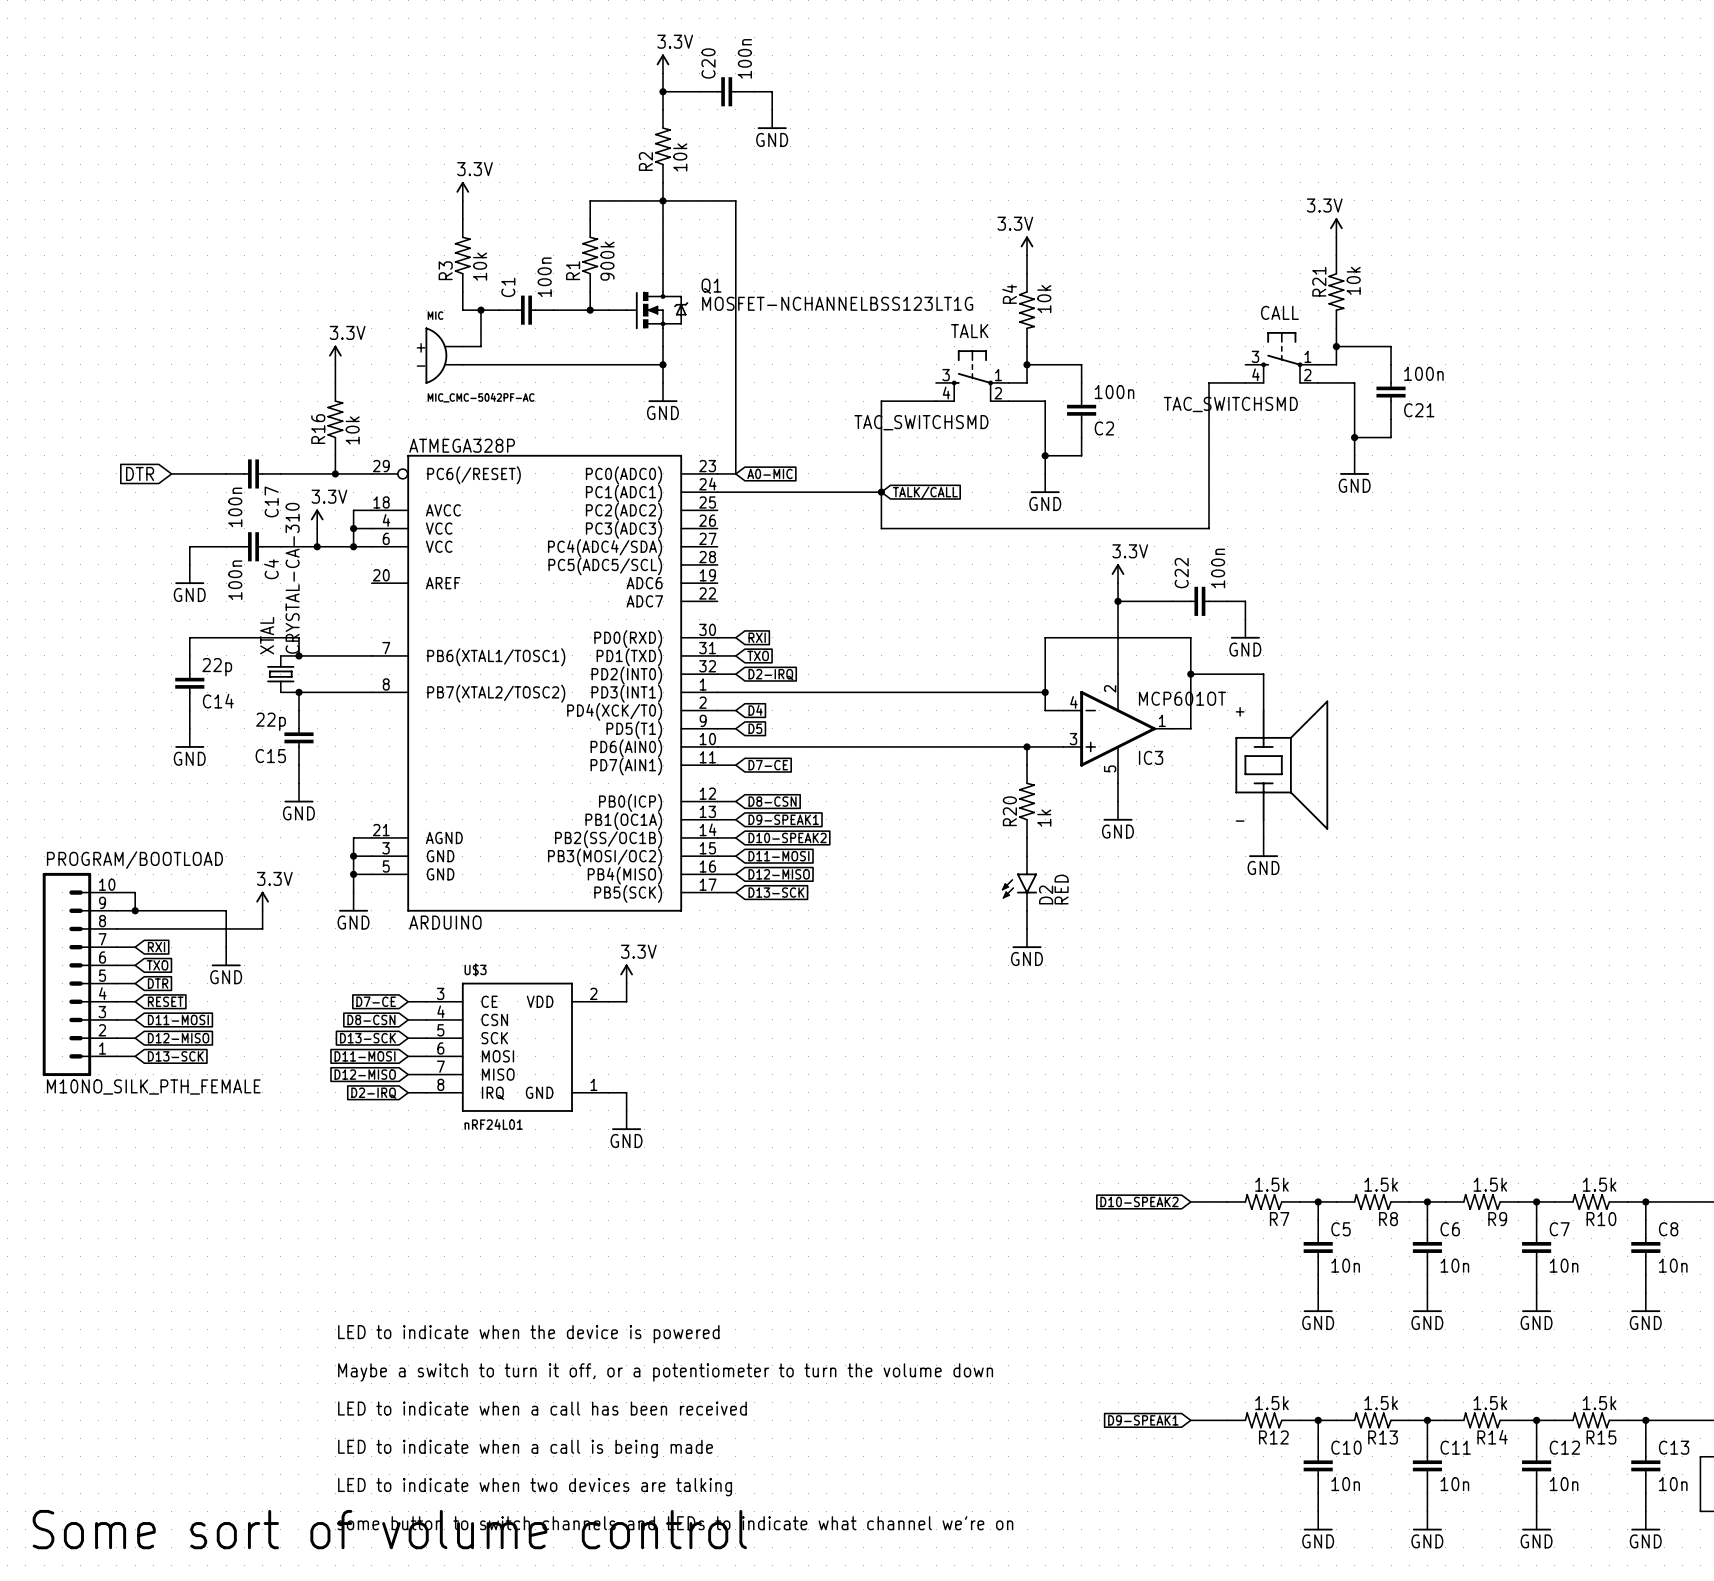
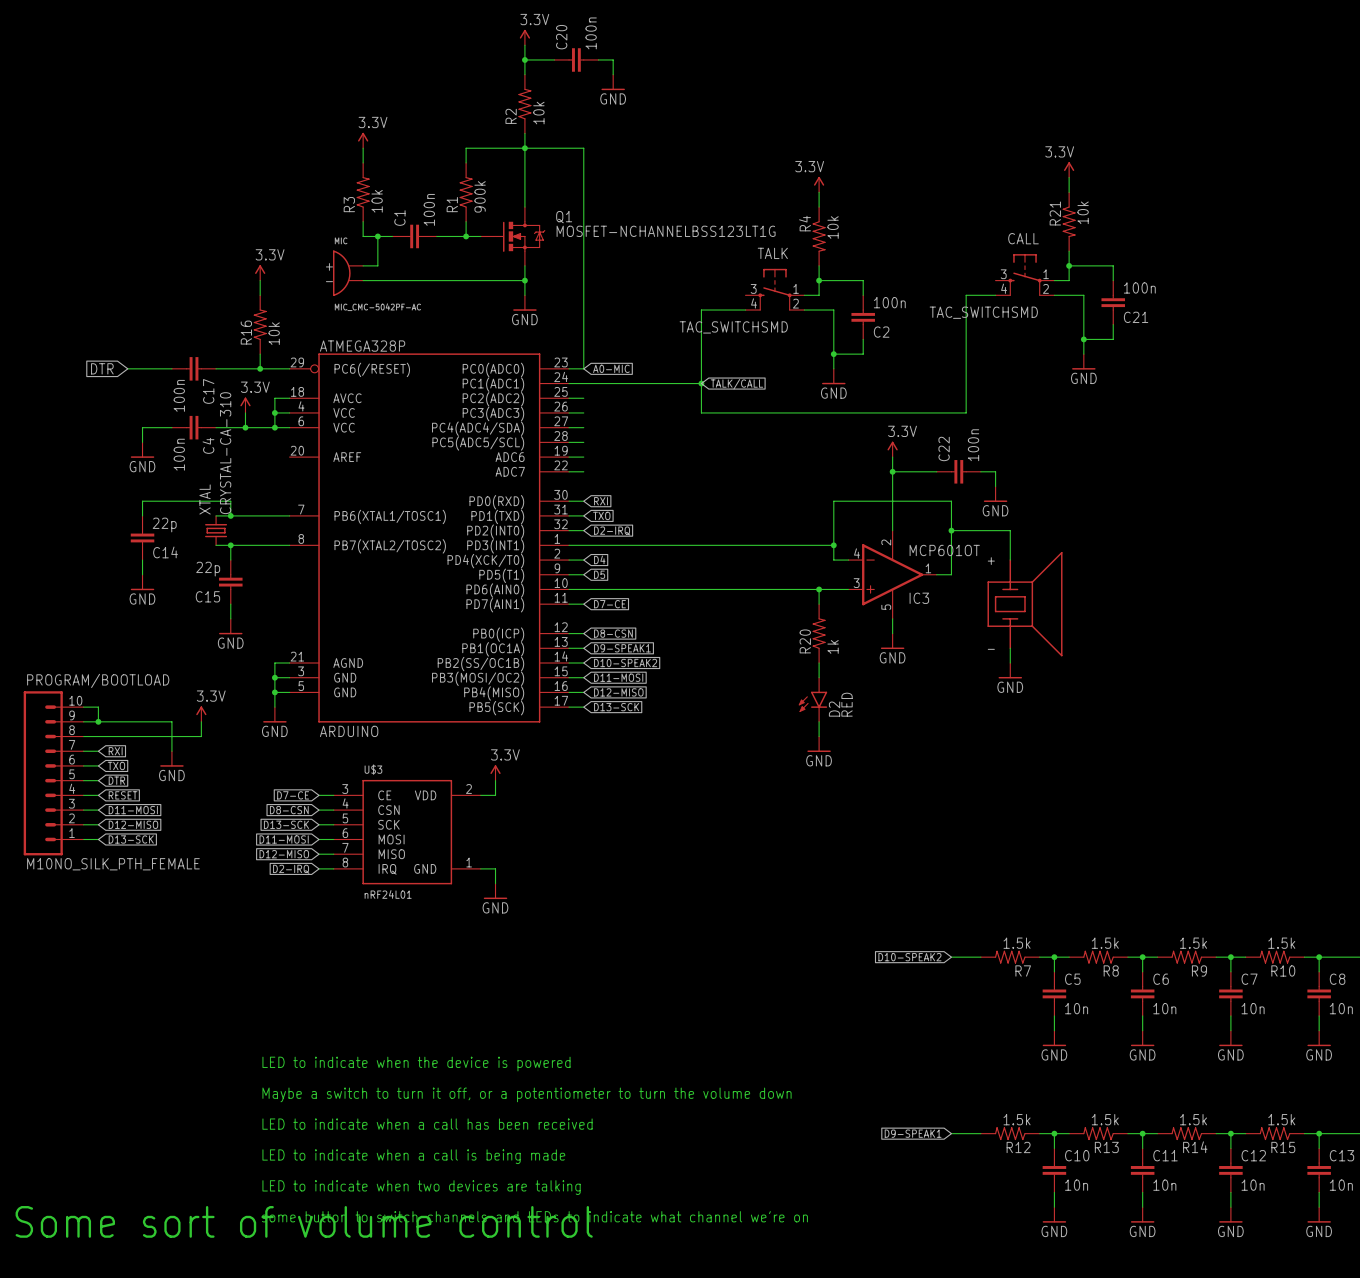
wire: none -> (569, 398) (583, 398)
wire: none -> (569, 412) (583, 412)
wire: none -> (569, 427) (583, 427)
wire: none -> (569, 442) (583, 442)
wire: none -> (569, 457) (583, 457)
wire: none -> (569, 471) (583, 471)

